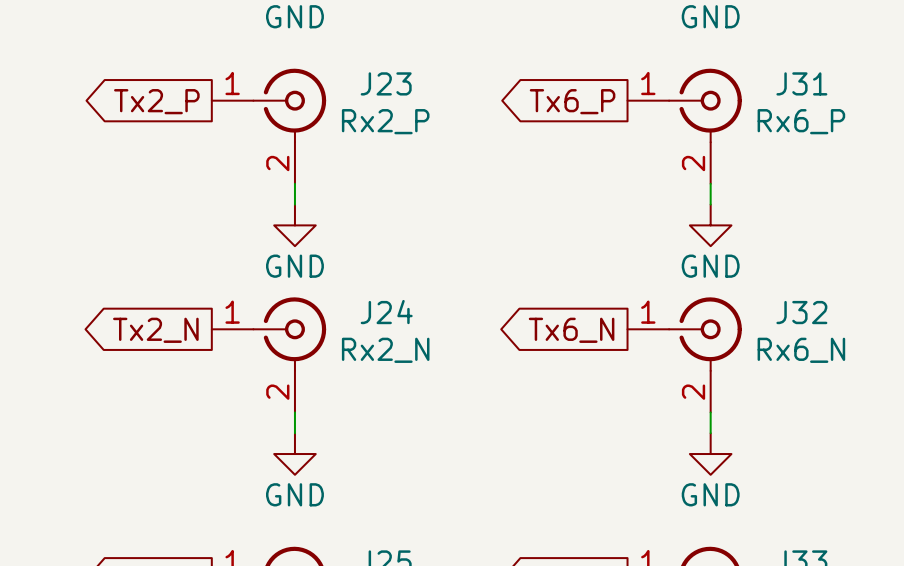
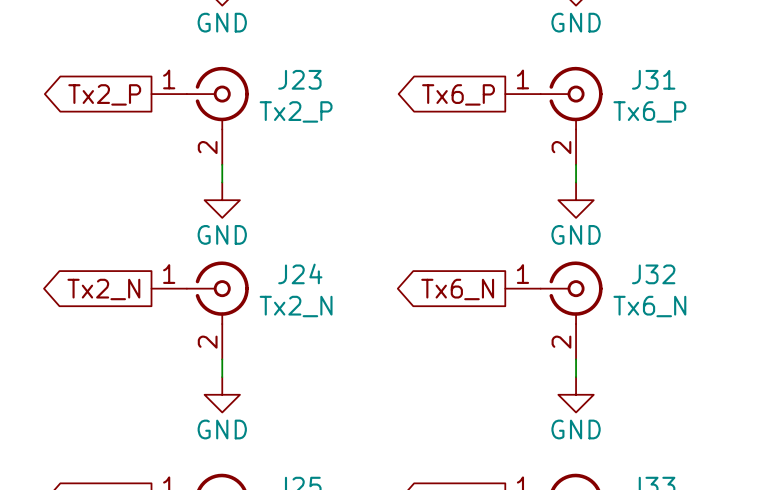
J23 value: Rx2_P (385, 121) -> Tx2_P (296, 111)
J31 value: Rx6_P (801, 121) -> Tx6_P (649, 111)
J24 value: Rx2_N (385, 350) -> Tx2_N (296, 306)
J32 value: Rx6_N (801, 350) -> Tx6_N (649, 306)

